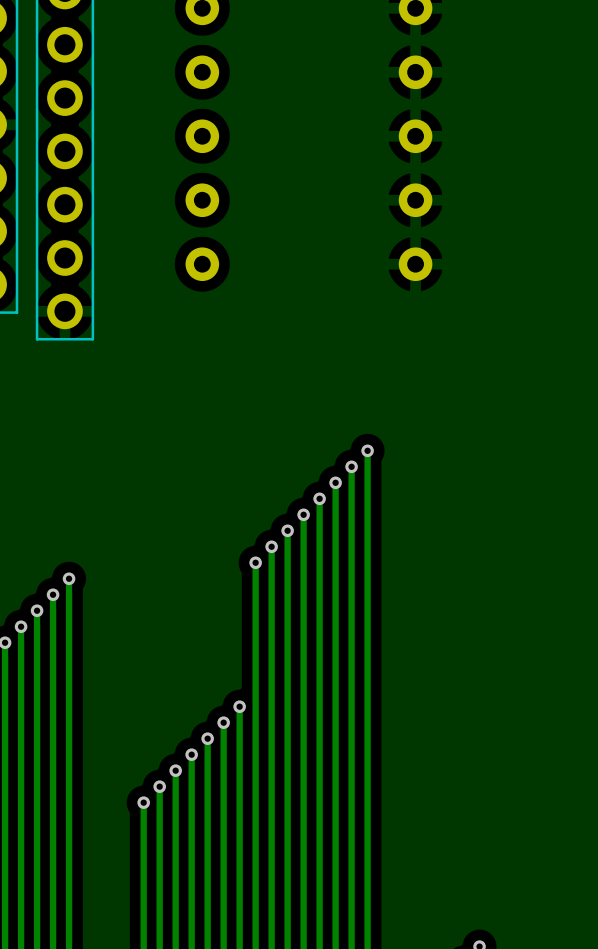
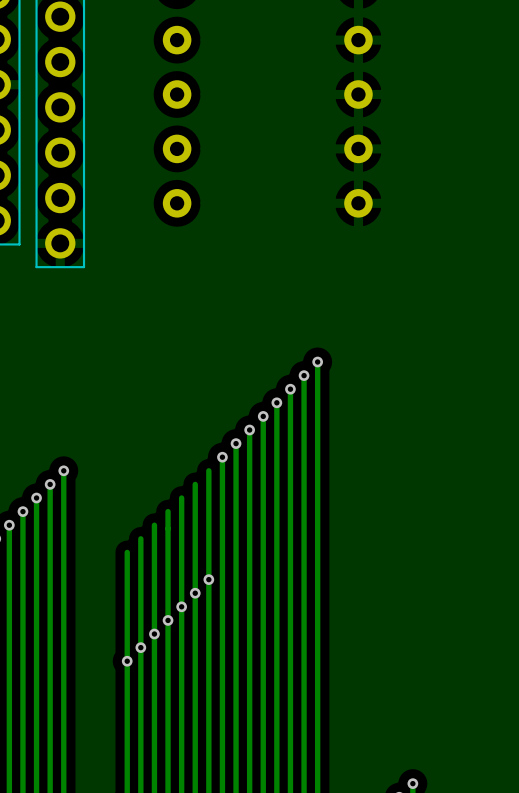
track: none -> (208, 470) (208, 579)
track: none -> (195, 484) (195, 593)
track: none -> (181, 498) (181, 606)
track: none -> (168, 511) (168, 620)
track: none -> (154, 525) (154, 634)
track: none -> (140, 538) (140, 647)
track: none -> (127, 552) (127, 661)

